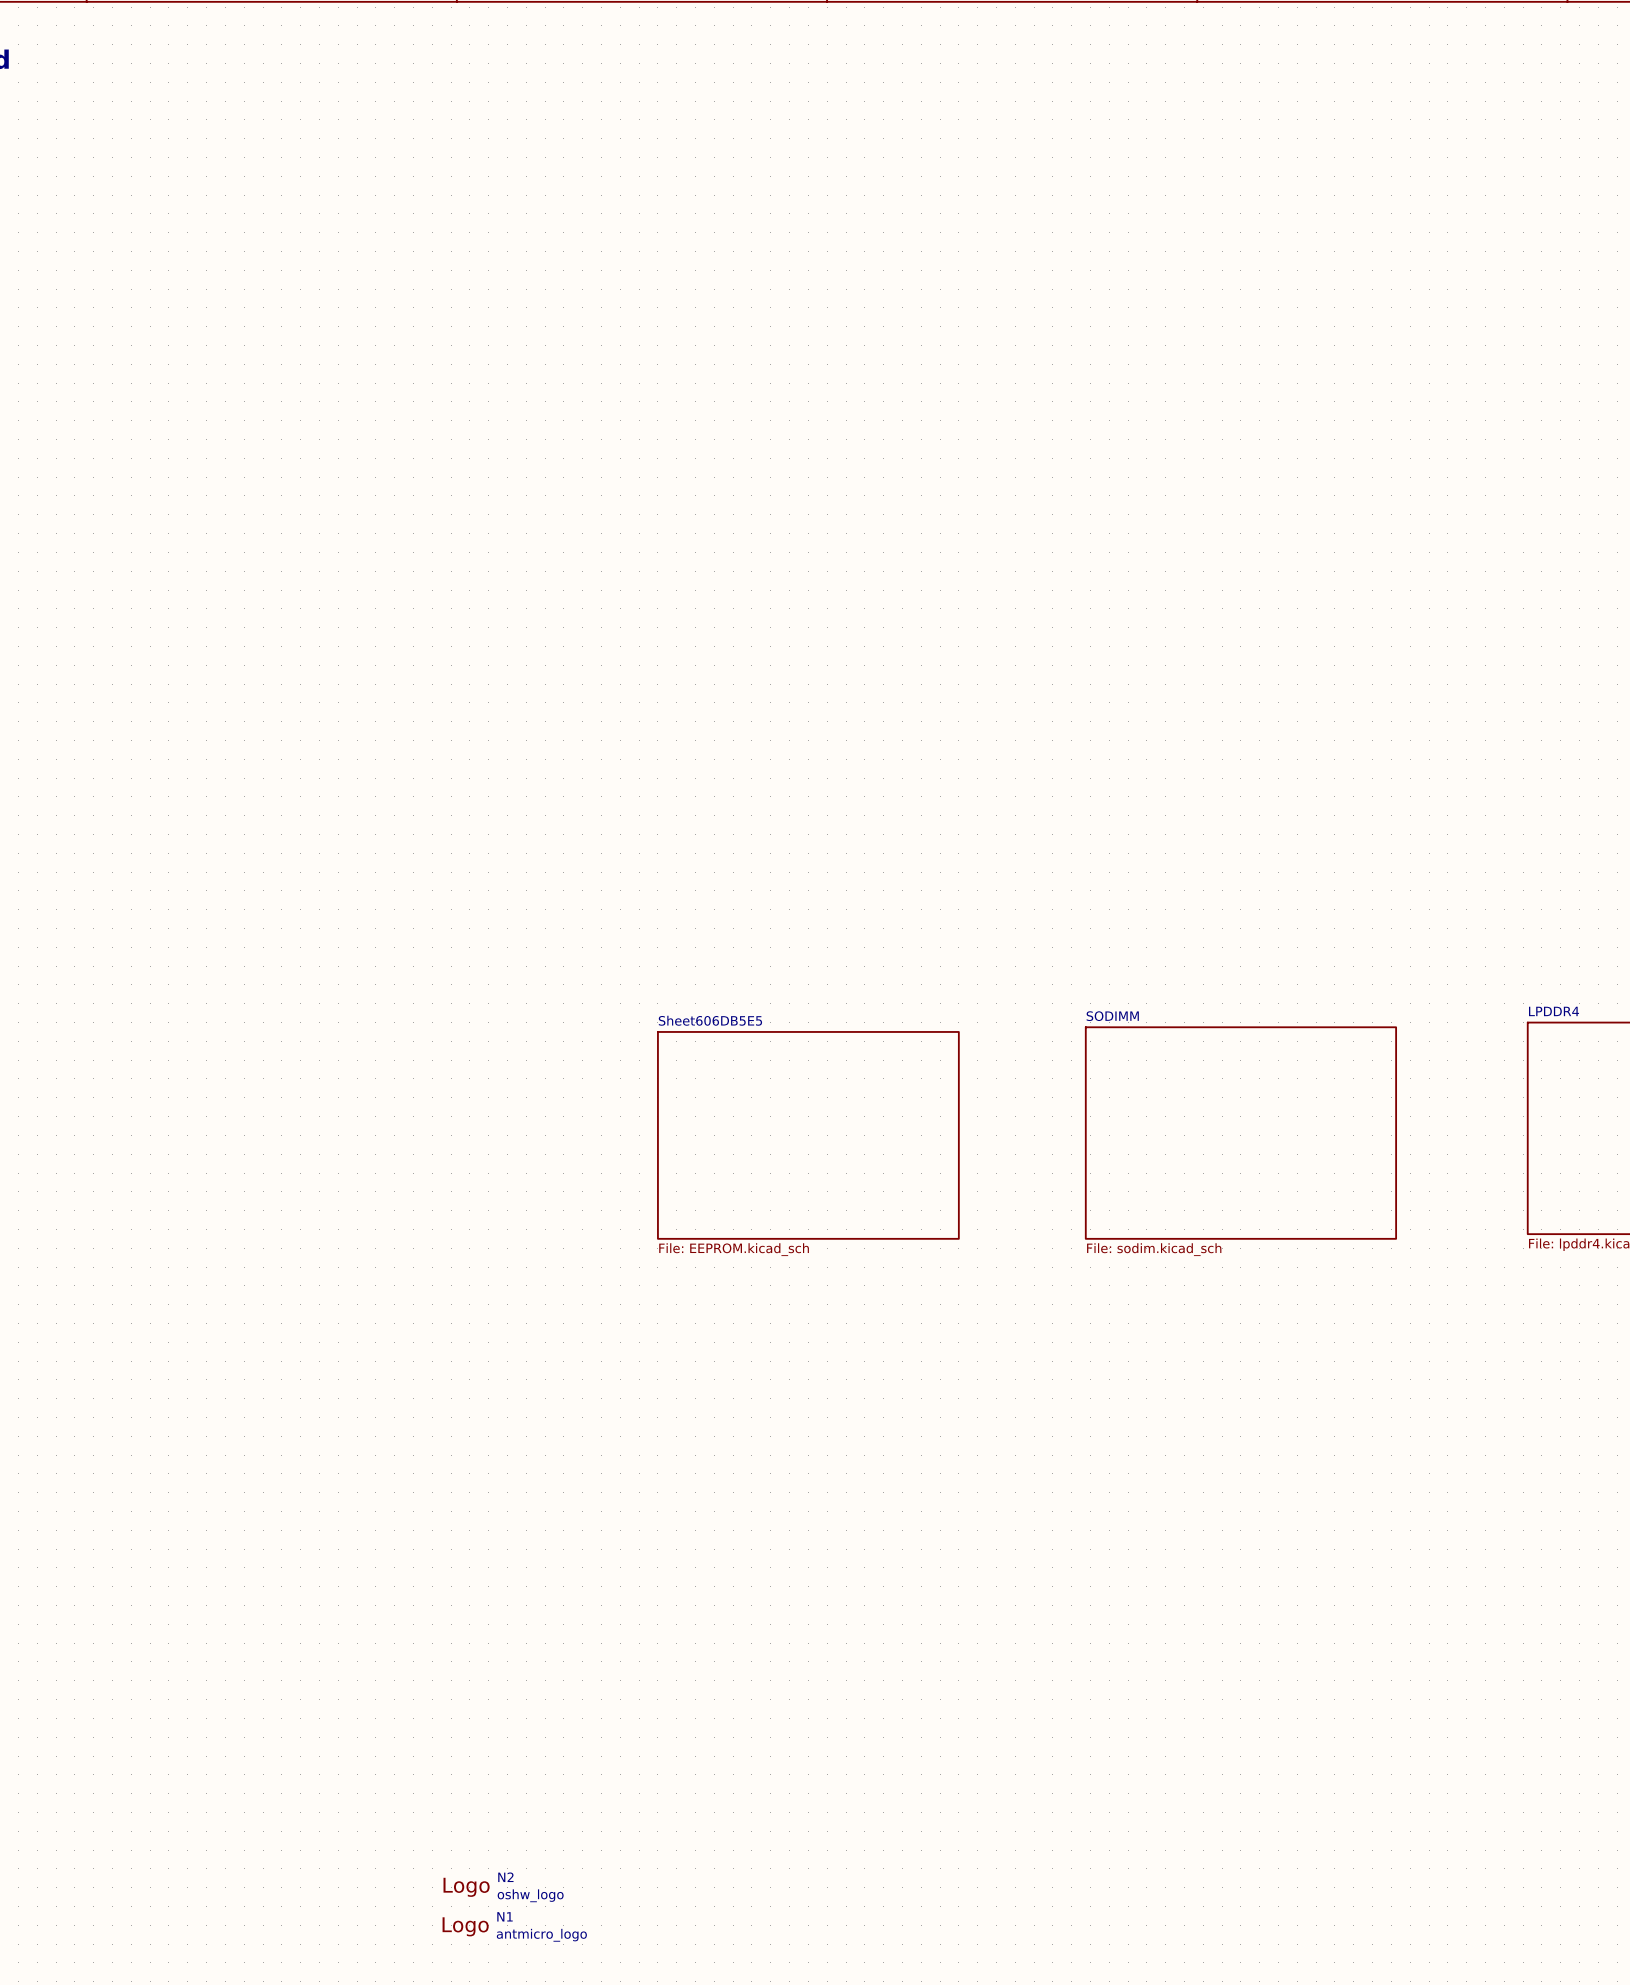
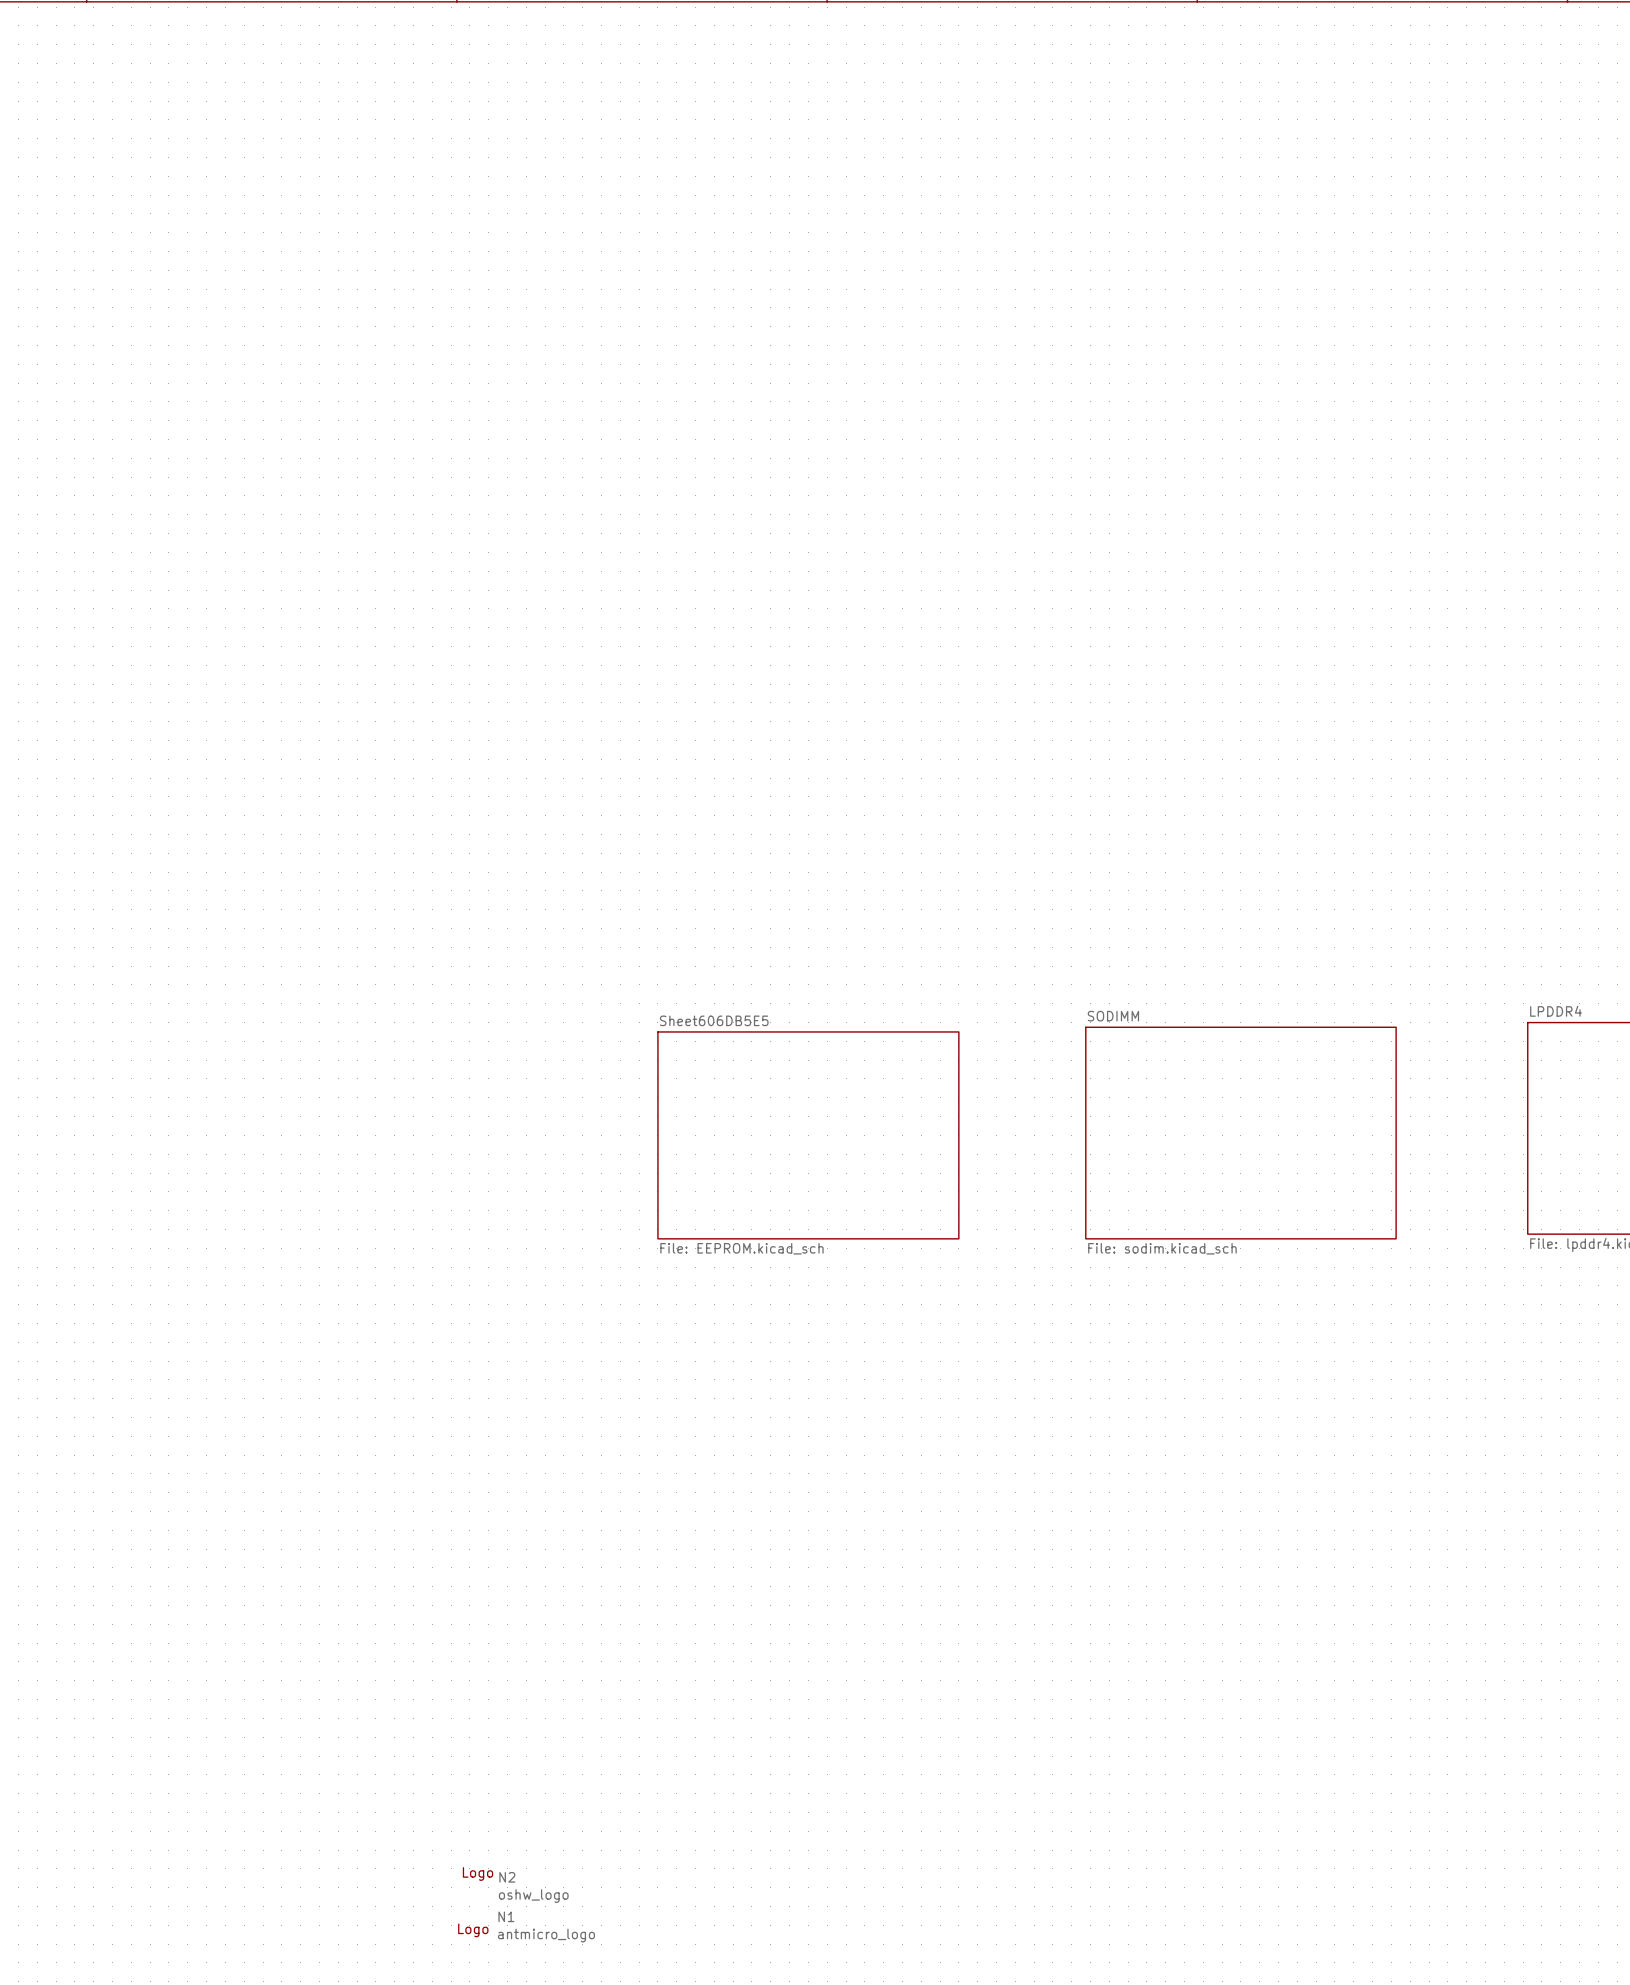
N2 symbol: [443, 1872, 564, 1903] -> [462, 1867, 569, 1903]
N1 symbol: [442, 1912, 587, 1942] -> [458, 1911, 595, 1943]

